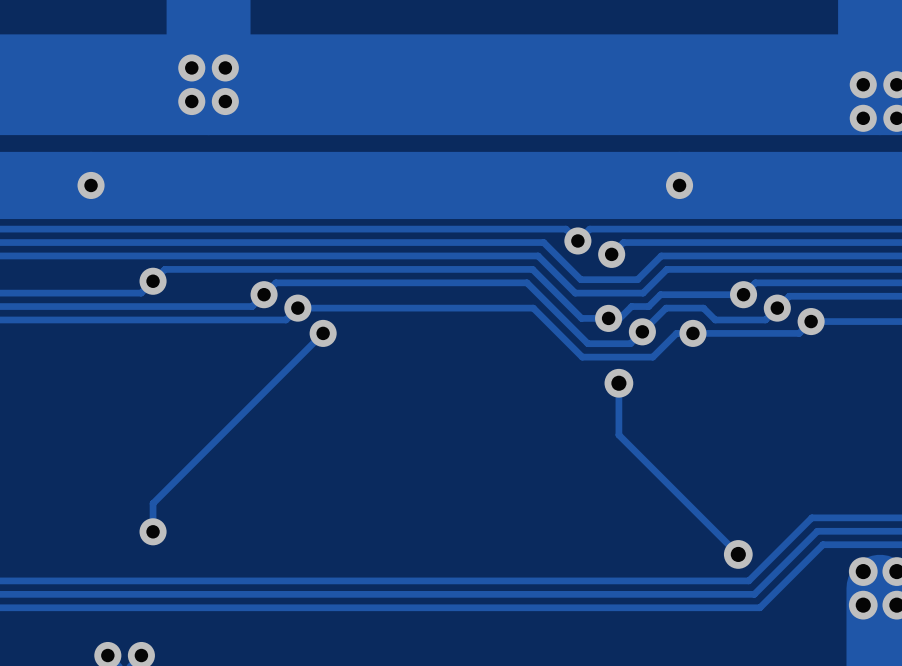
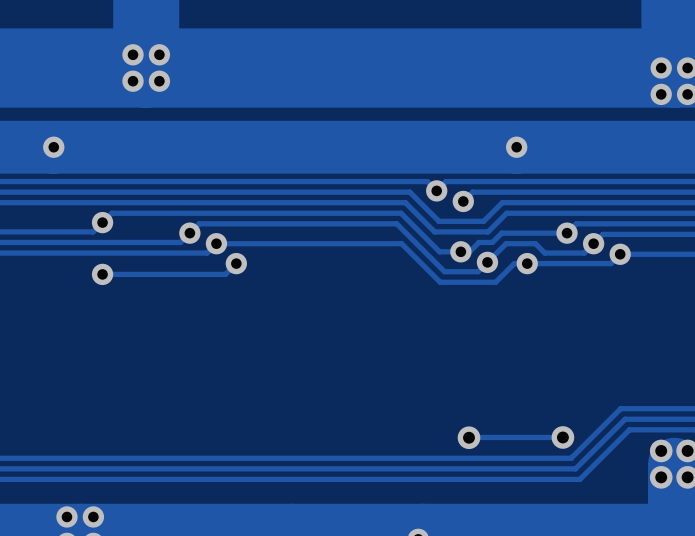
track: (309, 347) (153, 503) (153, 531) -> (225, 274) (102, 274)
track: (618, 383) (618, 435) (738, 554) -> (469, 437) (562, 437)
via position: (618, 383) -> (468, 437)
via position: (153, 531) -> (102, 274)

